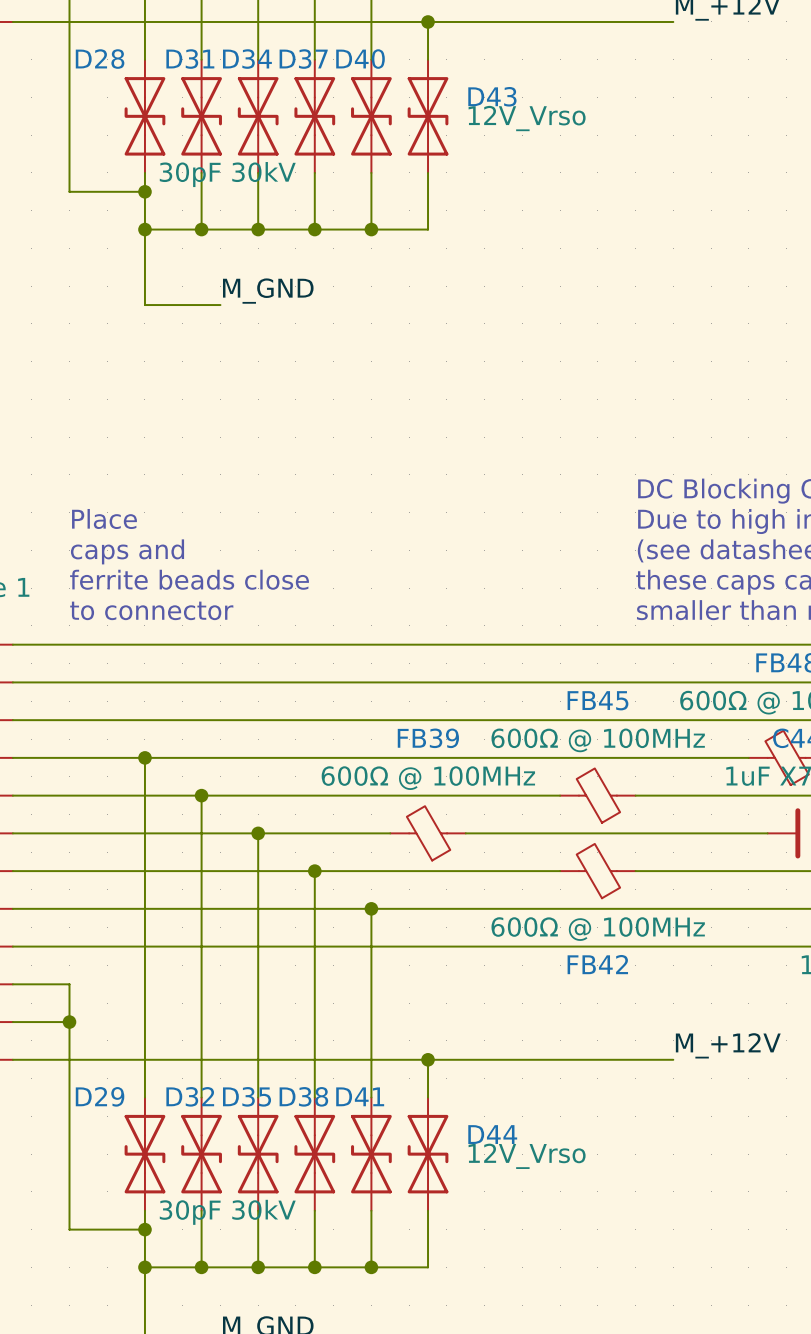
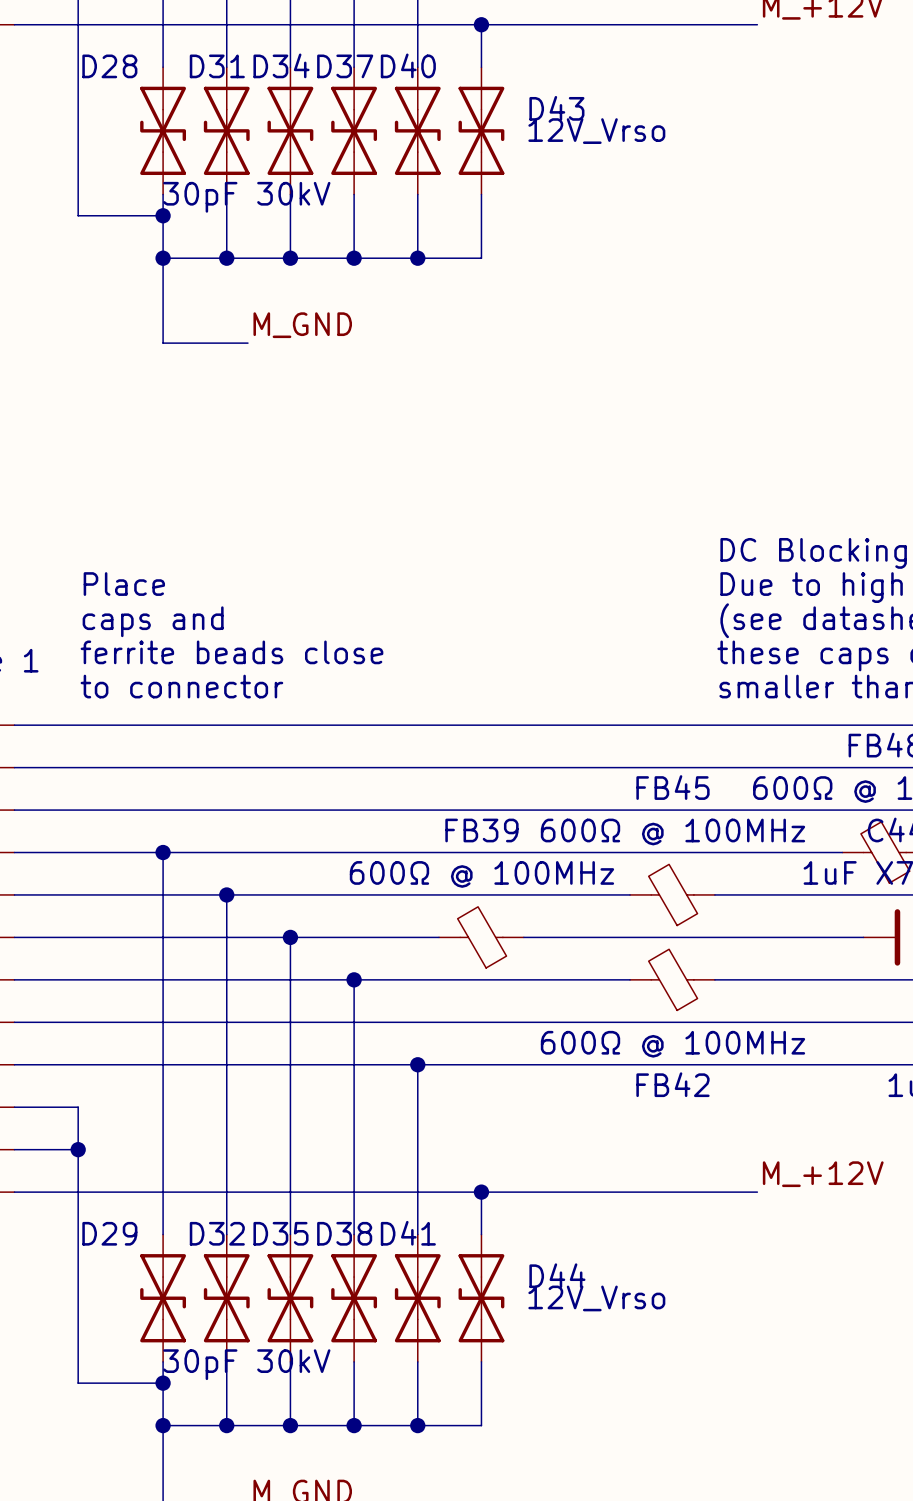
wire: (371, 908) (371, 946) -> none
junction position: (371, 908) -> (417, 1064)

